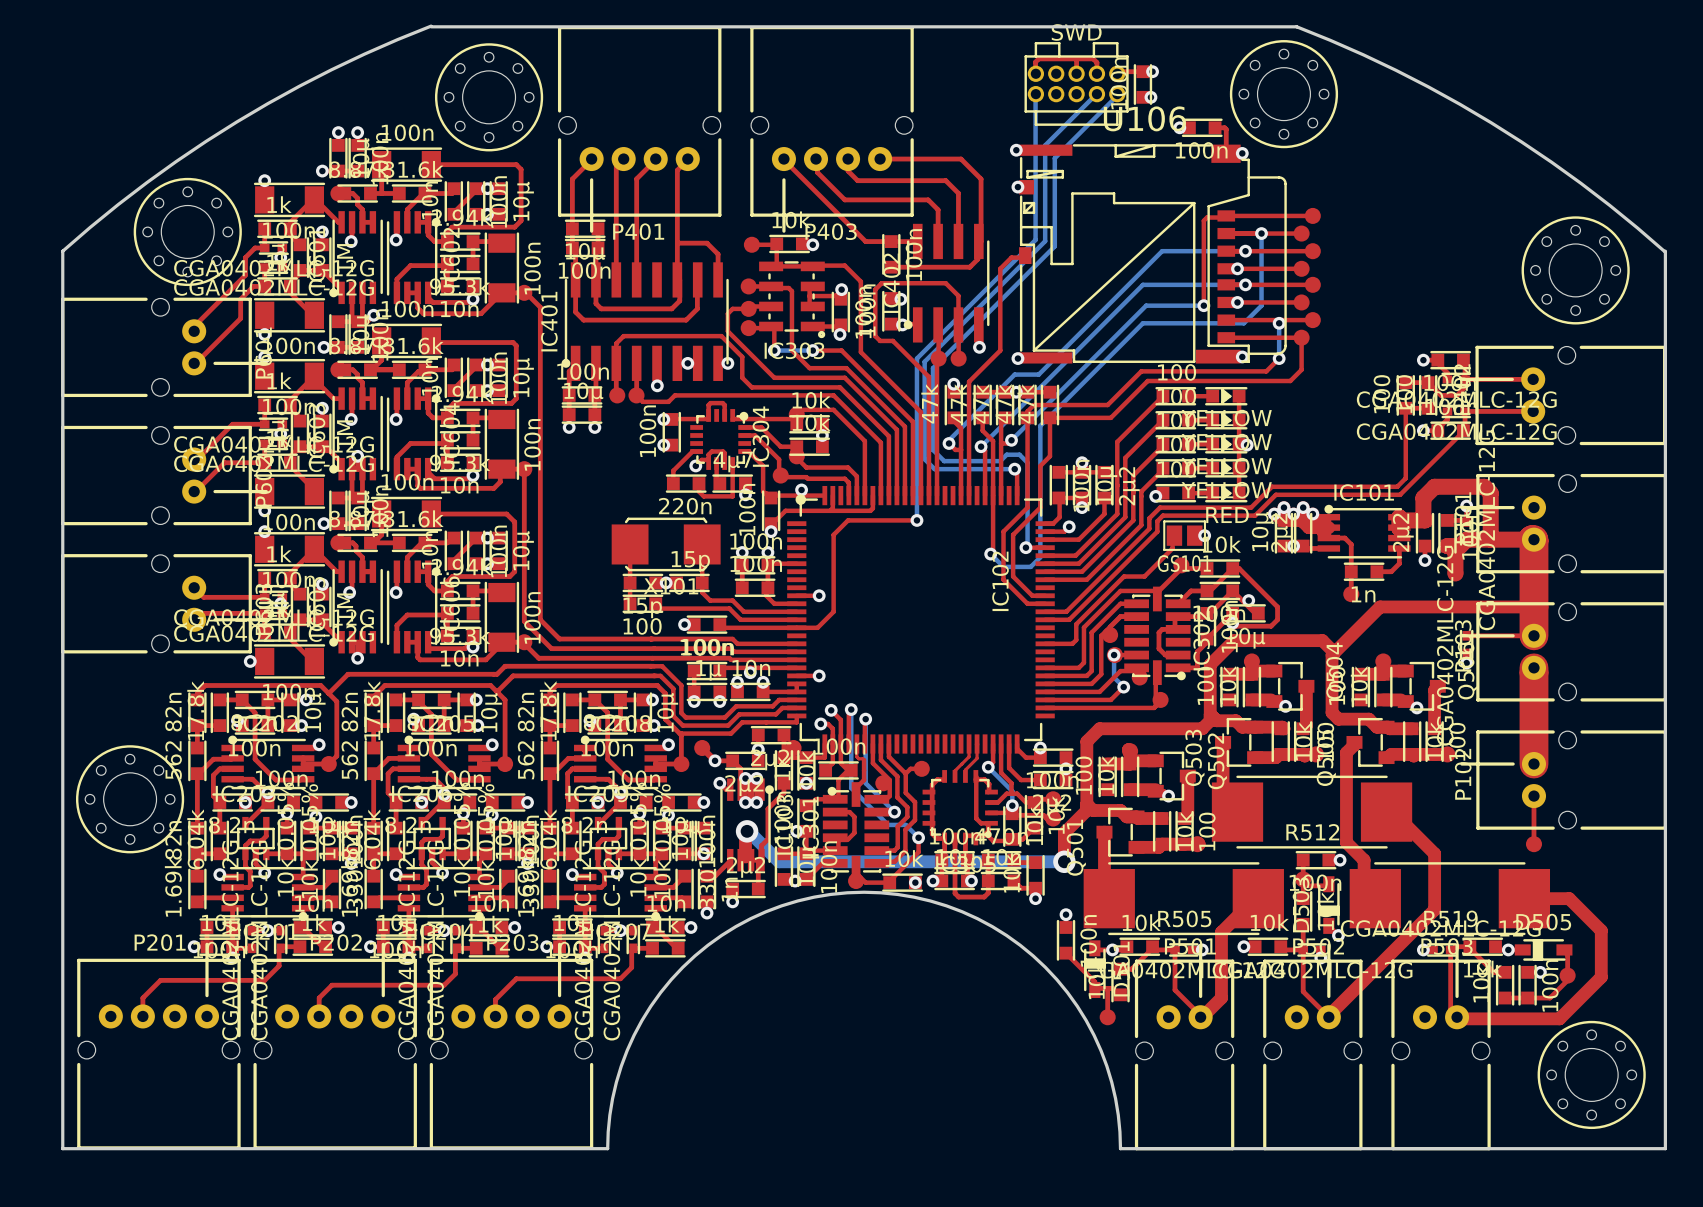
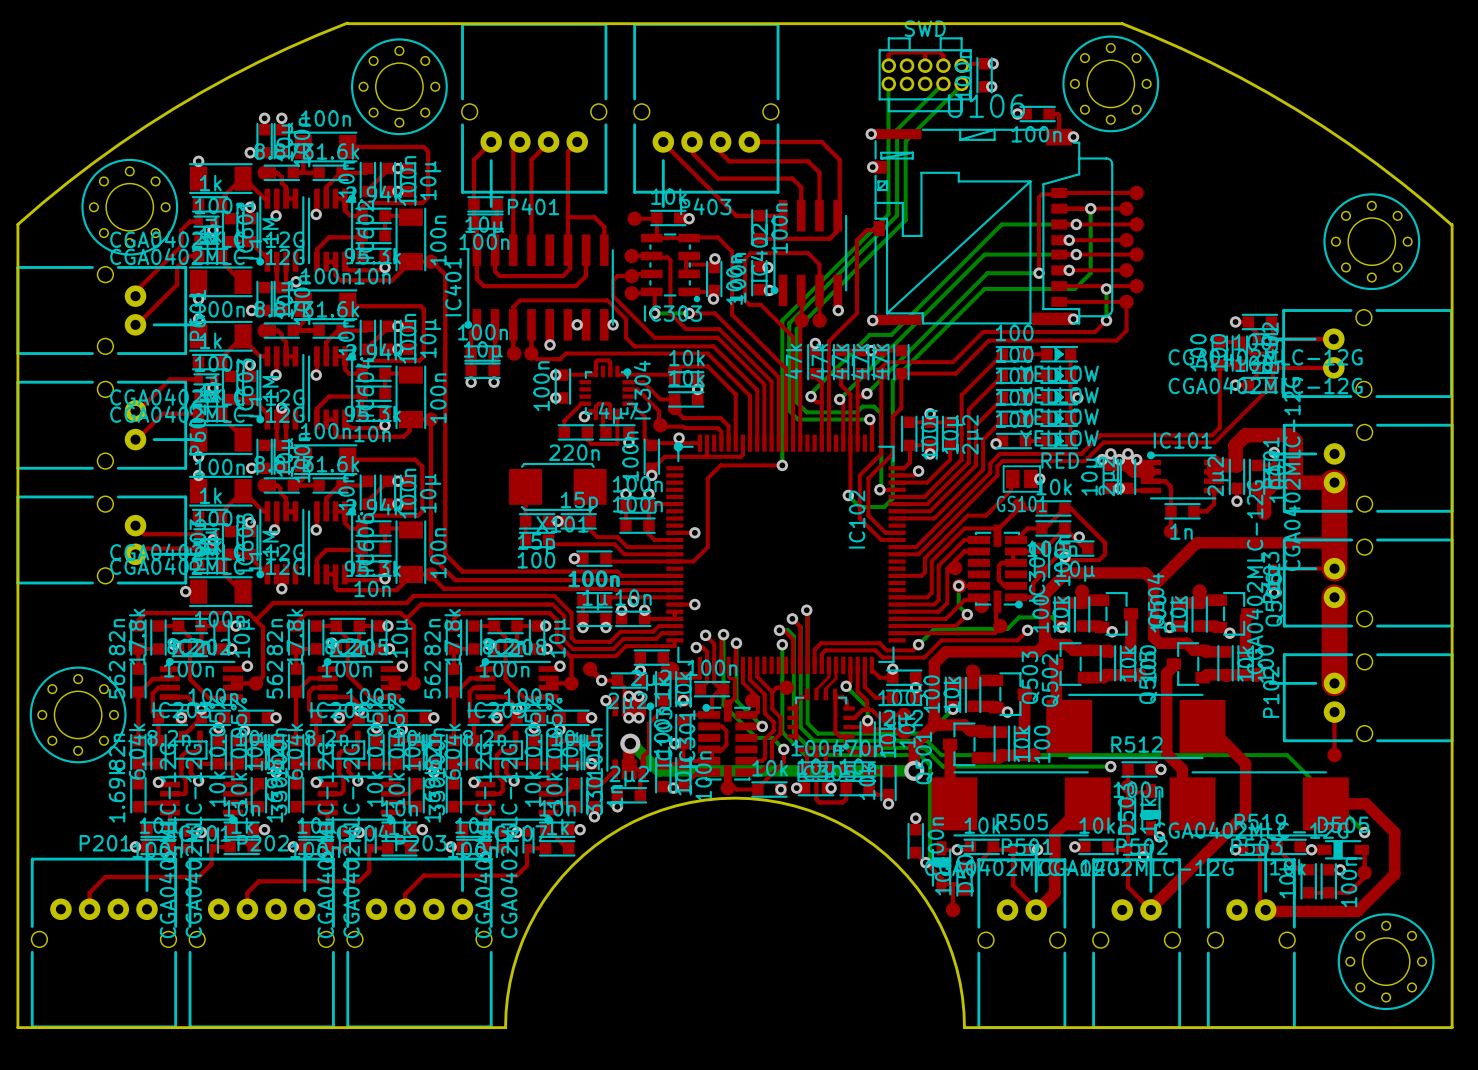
top track: none -> (806, 610) (807, 665)
bottom track: none -> (806, 610) (807, 723) (817, 733) (928, 733) (953, 709)
via: none -> (806, 610)
top track: none -> (792, 618) (800, 626) (800, 665)
bottom track: none -> (792, 618) (800, 627) (800, 727) (813, 740) (926, 740) (941, 755) (1287, 755) (1364, 832)
via: none -> (792, 618)
bottom track: none -> (1062, 627) (1051, 617) (1018, 617) (1007, 628) (934, 628) (918, 644)
via: none -> (1062, 627)
via: none -> (1169, 627)
top track: none -> (779, 630) (783, 630) (793, 639) (793, 665)
bottom track: none -> (779, 630) (788, 630) (793, 636) (793, 732) (809, 747) (924, 747) (942, 766) (1110, 766)
via: none -> (779, 630)
top track: none -> (1027, 630) (1017, 640) (941, 640) (924, 657) (882, 657) (875, 650) (825, 650) (821, 654) (821, 665)
via: none -> (1027, 630)
bottom track: none -> (782, 644) (782, 732) (805, 755) (920, 755) (930, 765) (930, 858) (925, 862)
via: none -> (782, 644)
top track: none -> (918, 644) (912, 650) (886, 650) (879, 643) (821, 643) (814, 649) (814, 665)
via: none -> (918, 644)
via: none -> (953, 709)
via: none -> (1110, 766)
via: none -> (1364, 832)
via: none -> (925, 862)

